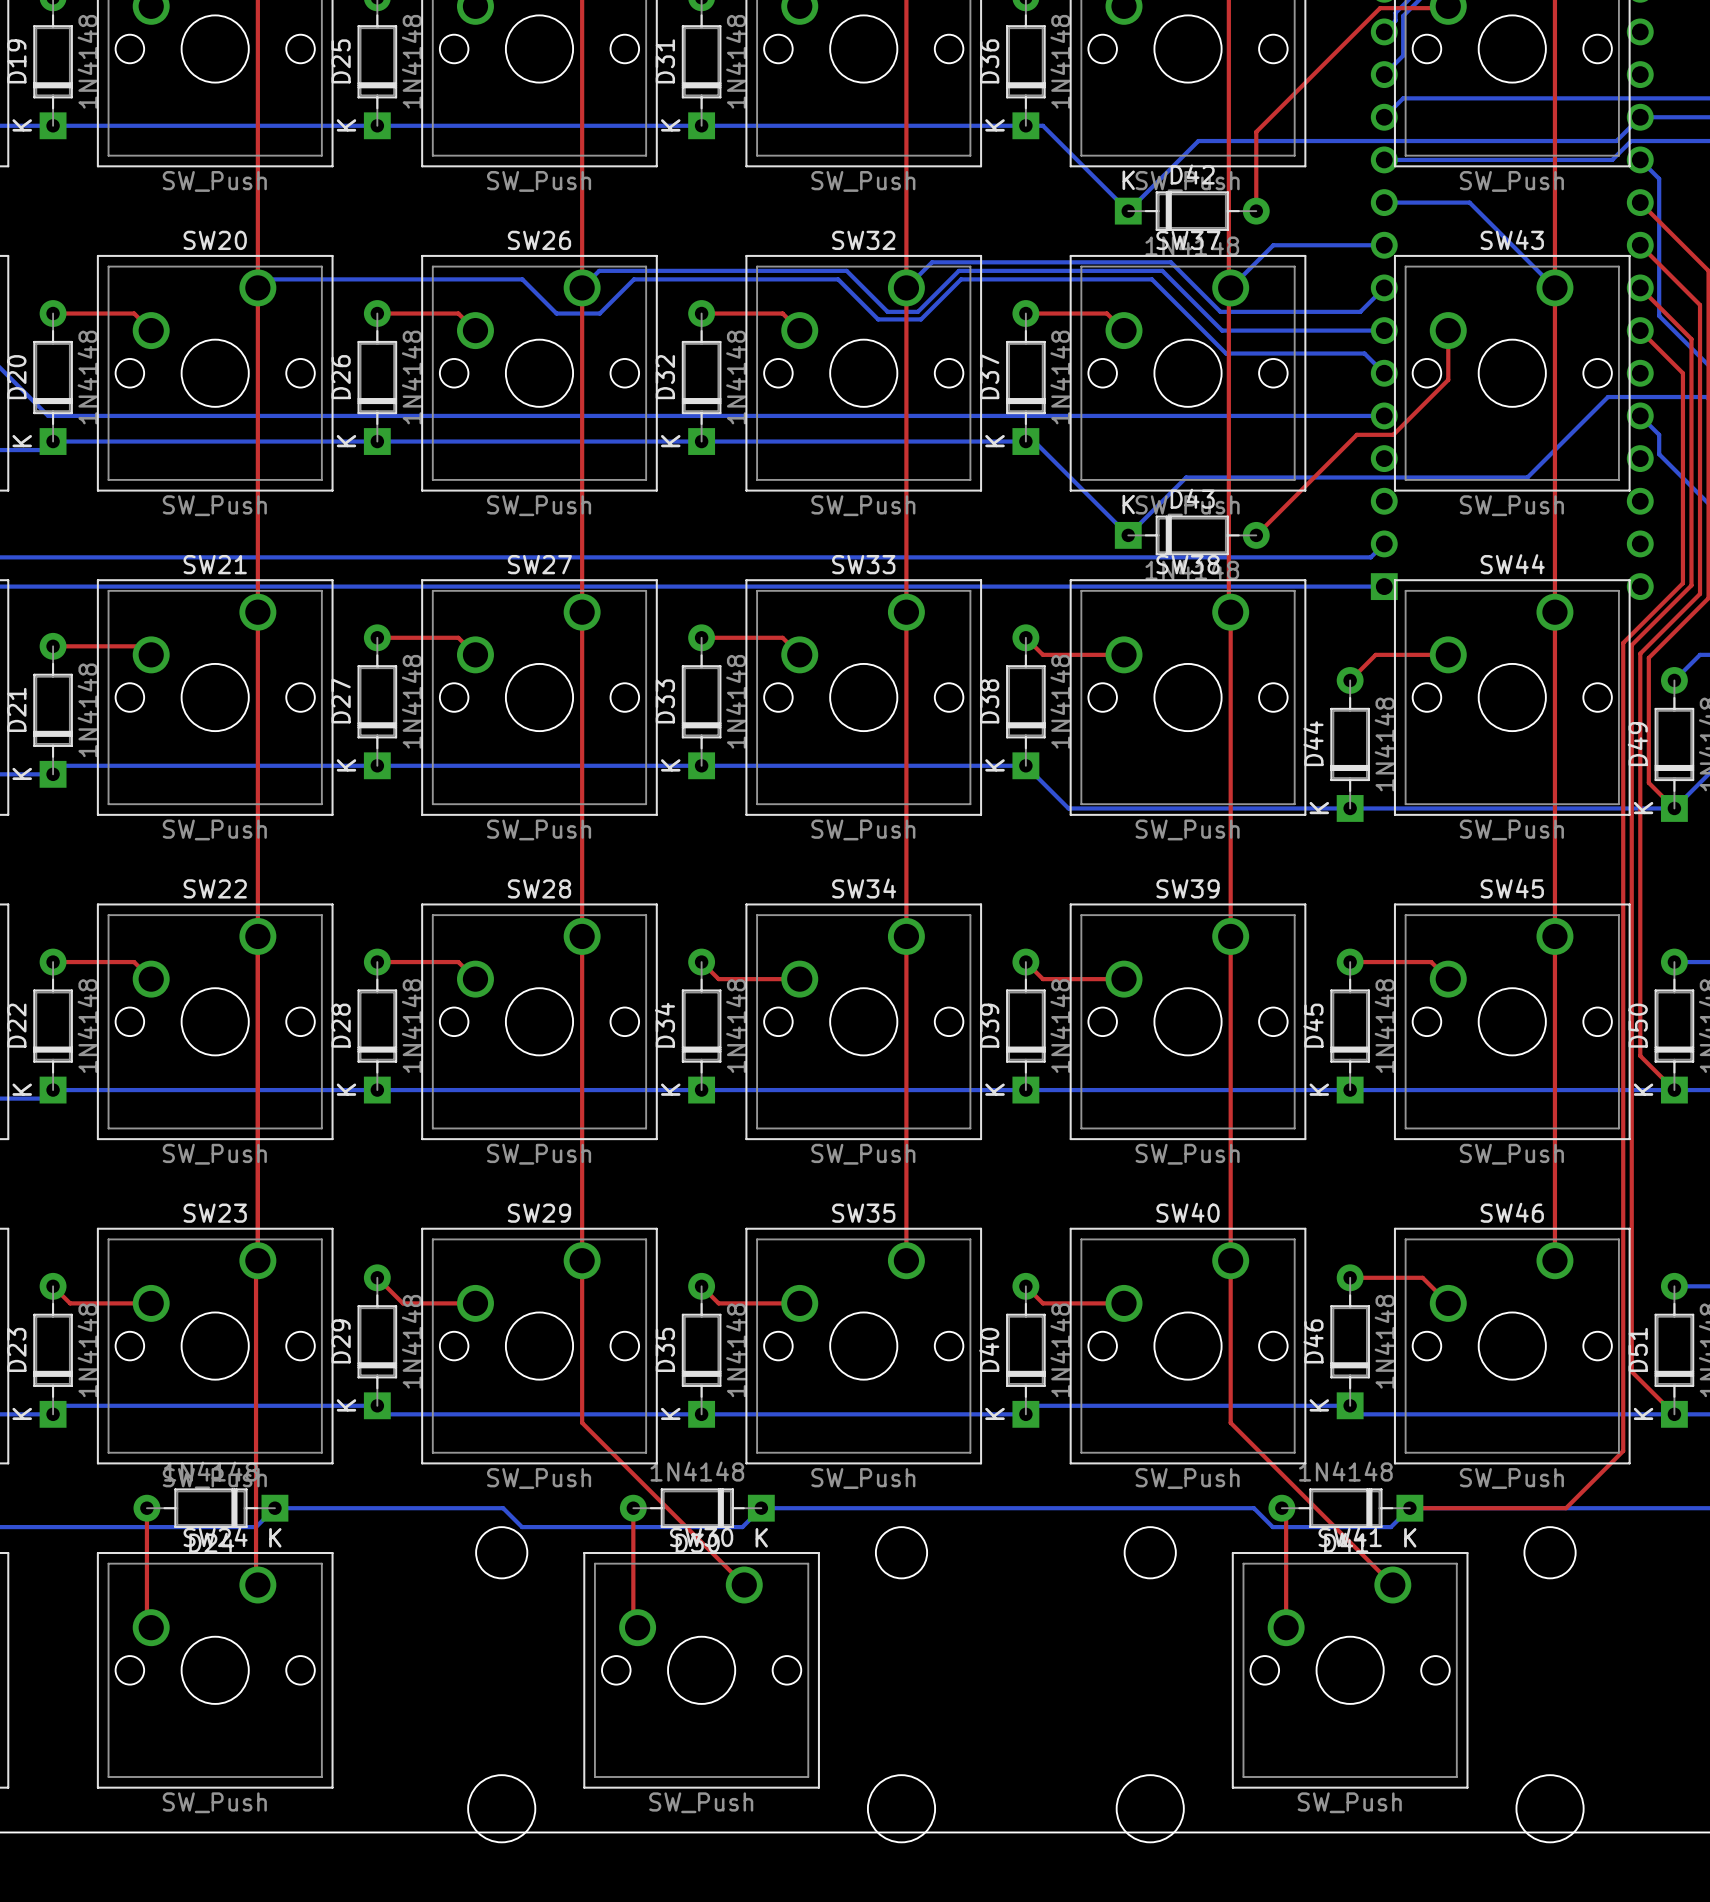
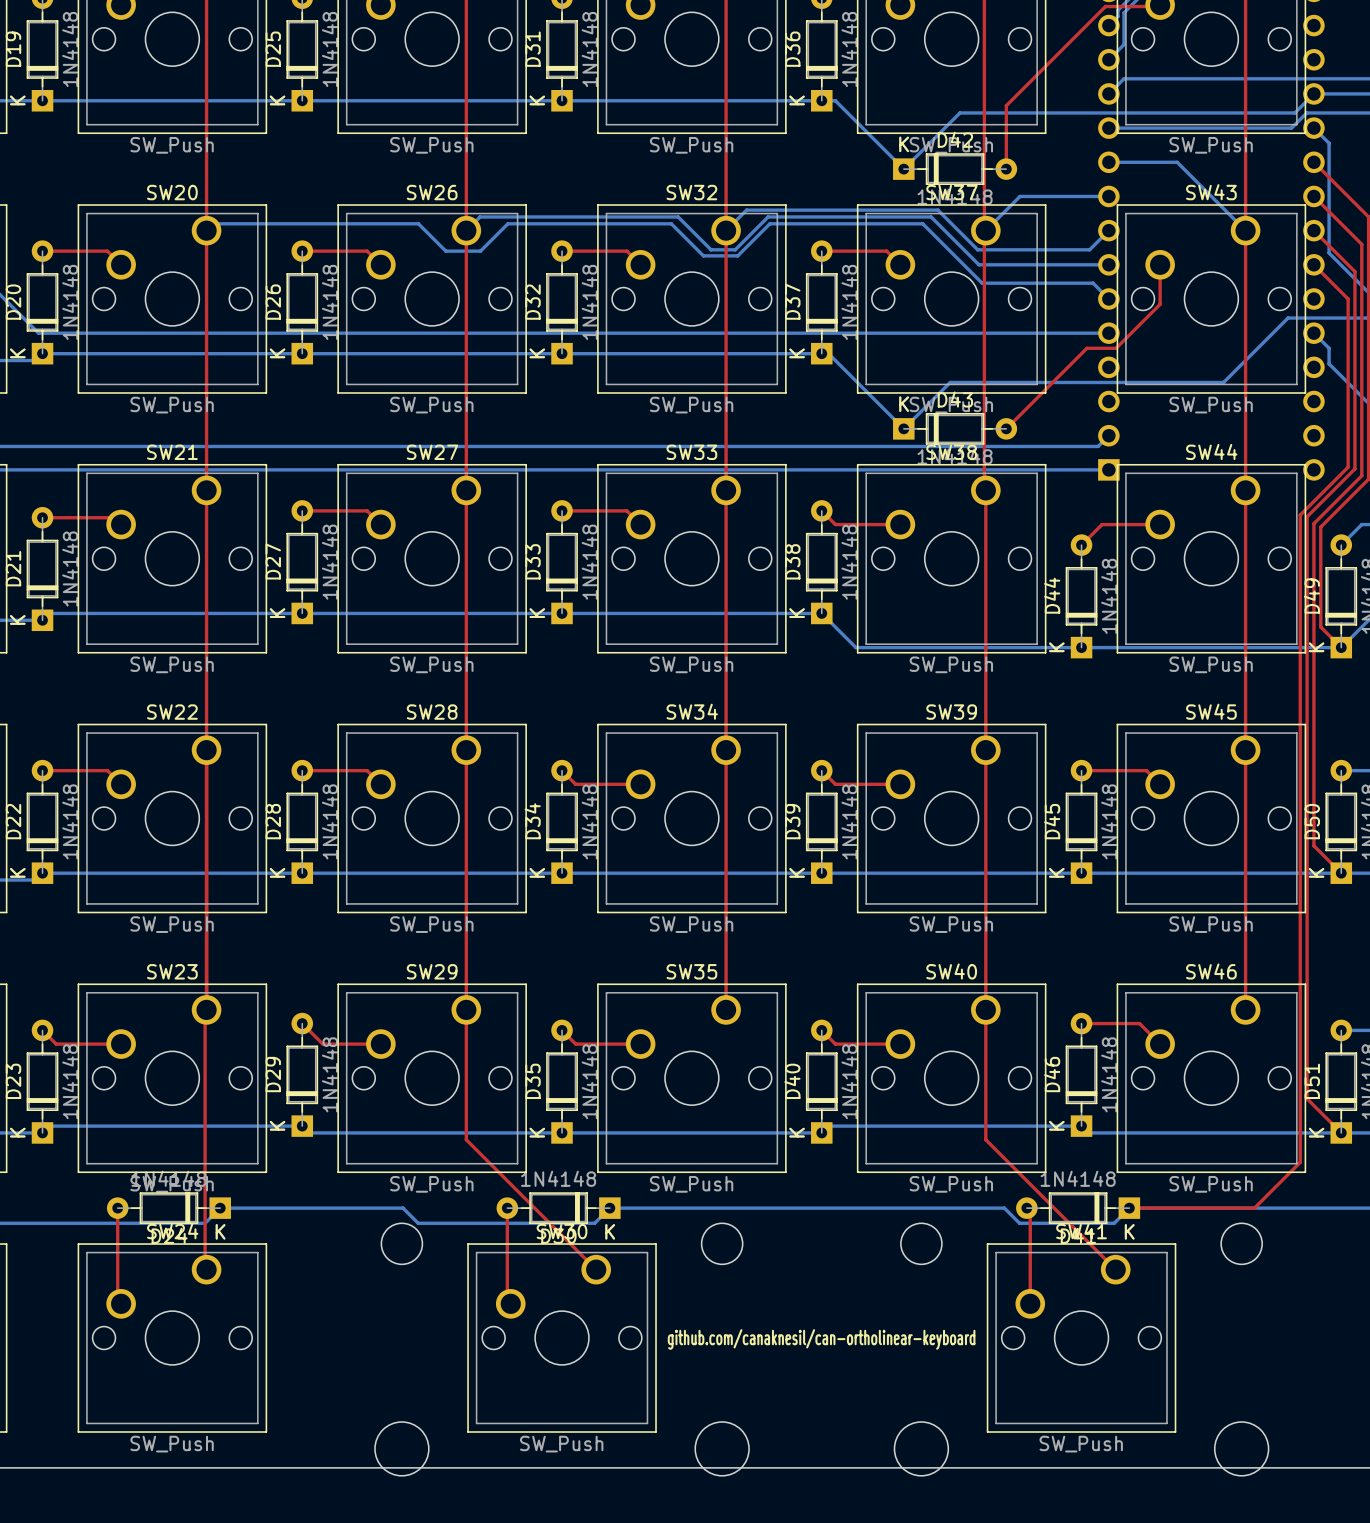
text: none -> github.com/canaknesil/can-ortholinear-keyboard (821, 1339)

